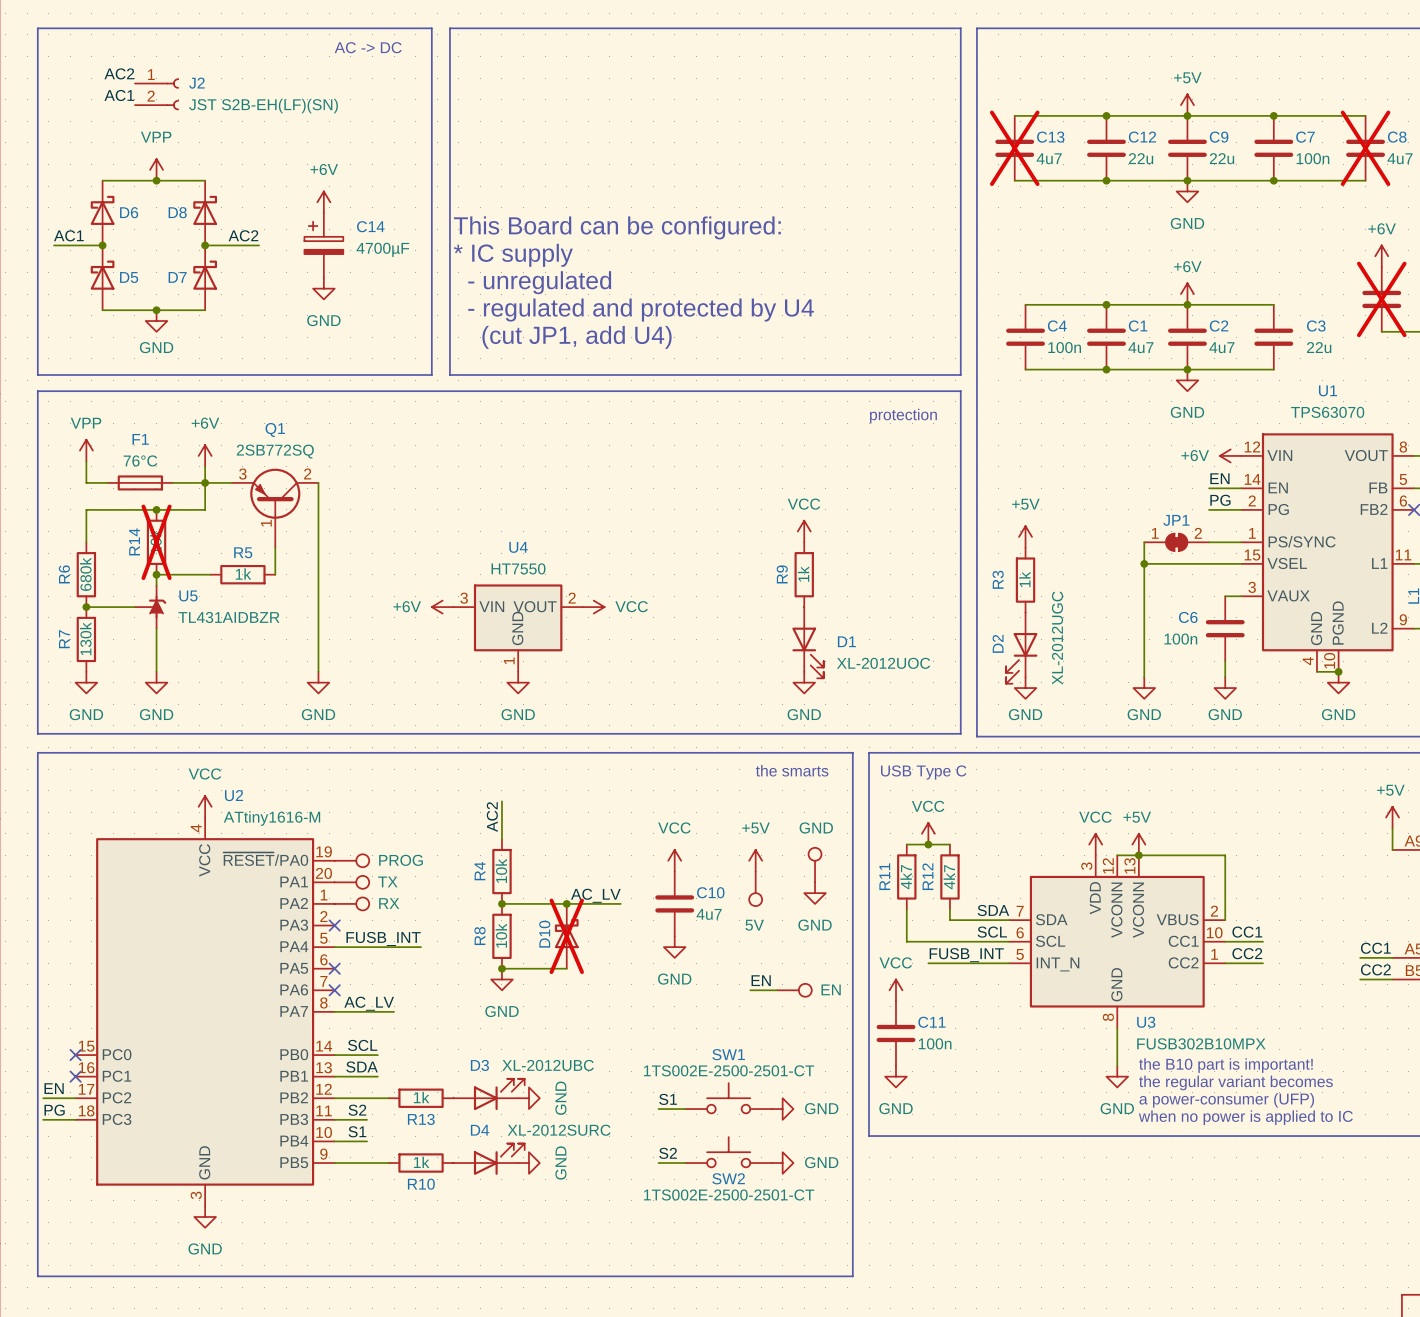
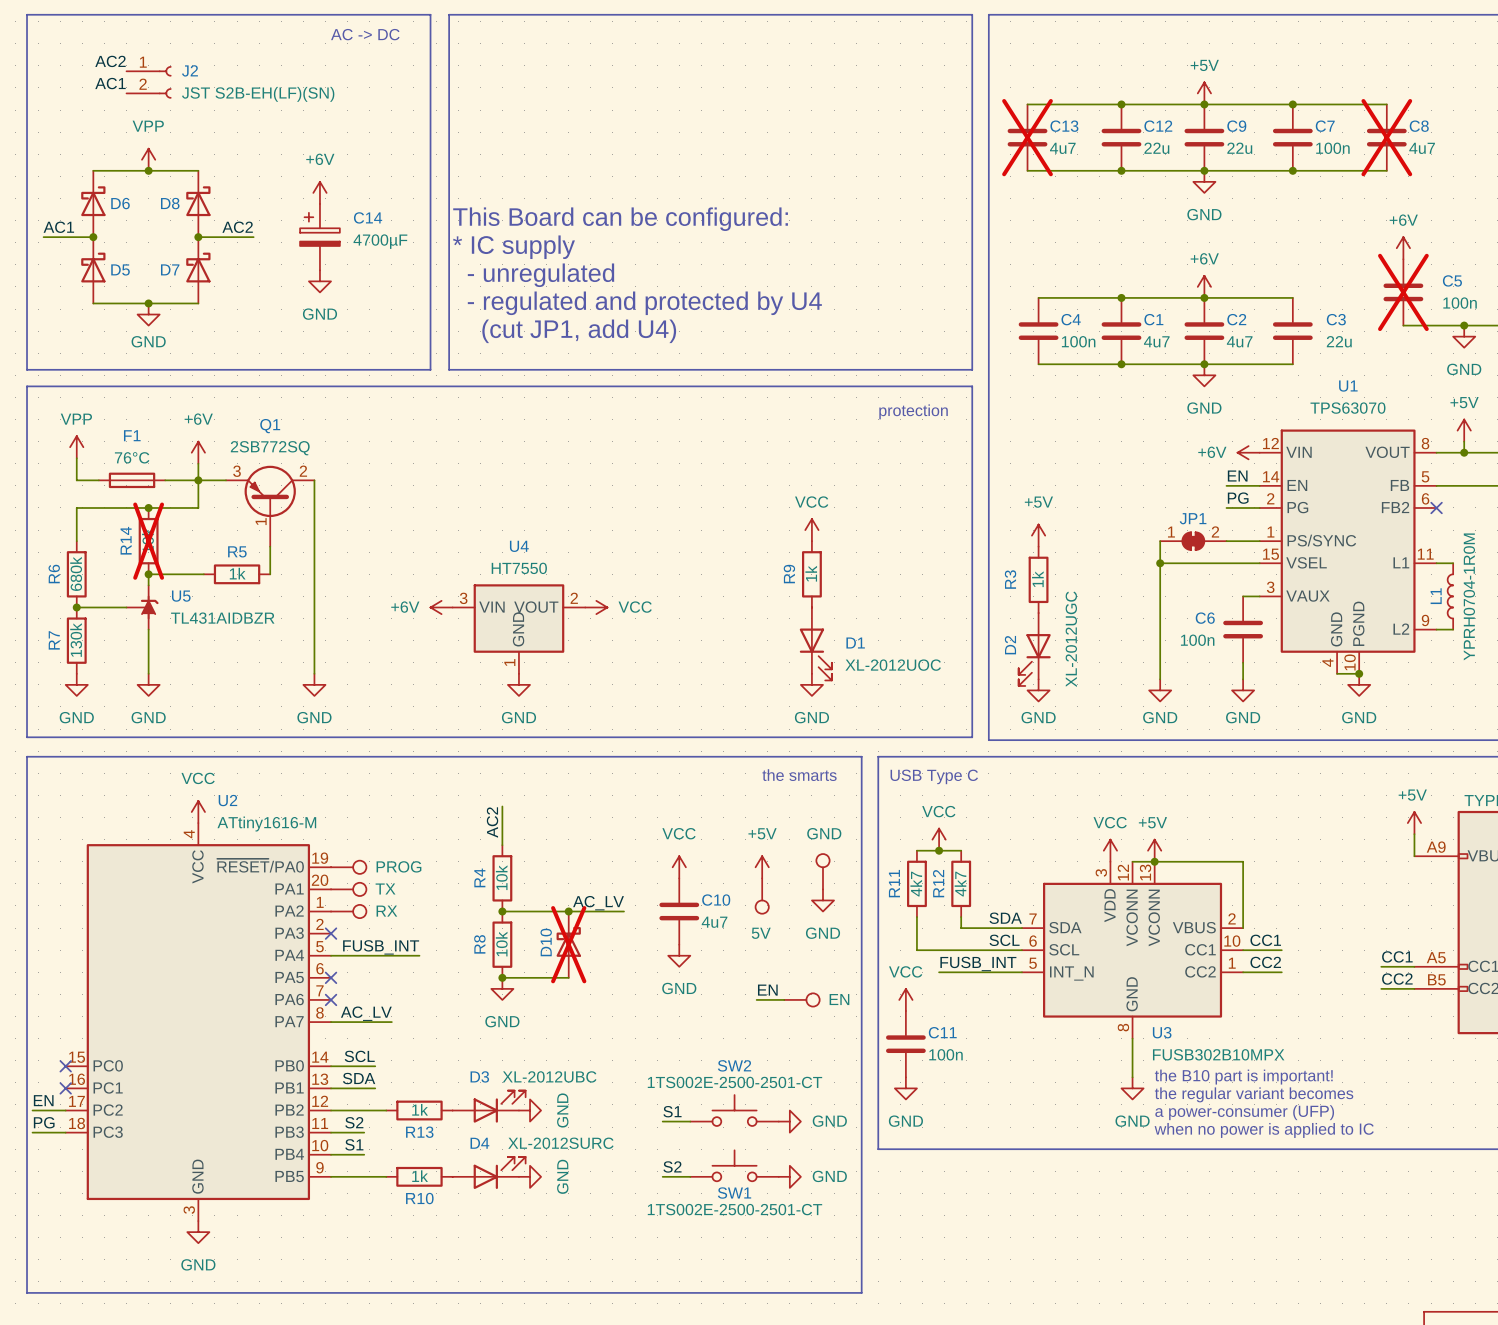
SW1 name: SW1 (728, 1054) -> SW2 (734, 1065)
SW2 name: SW2 (728, 1178) -> SW1 (734, 1193)

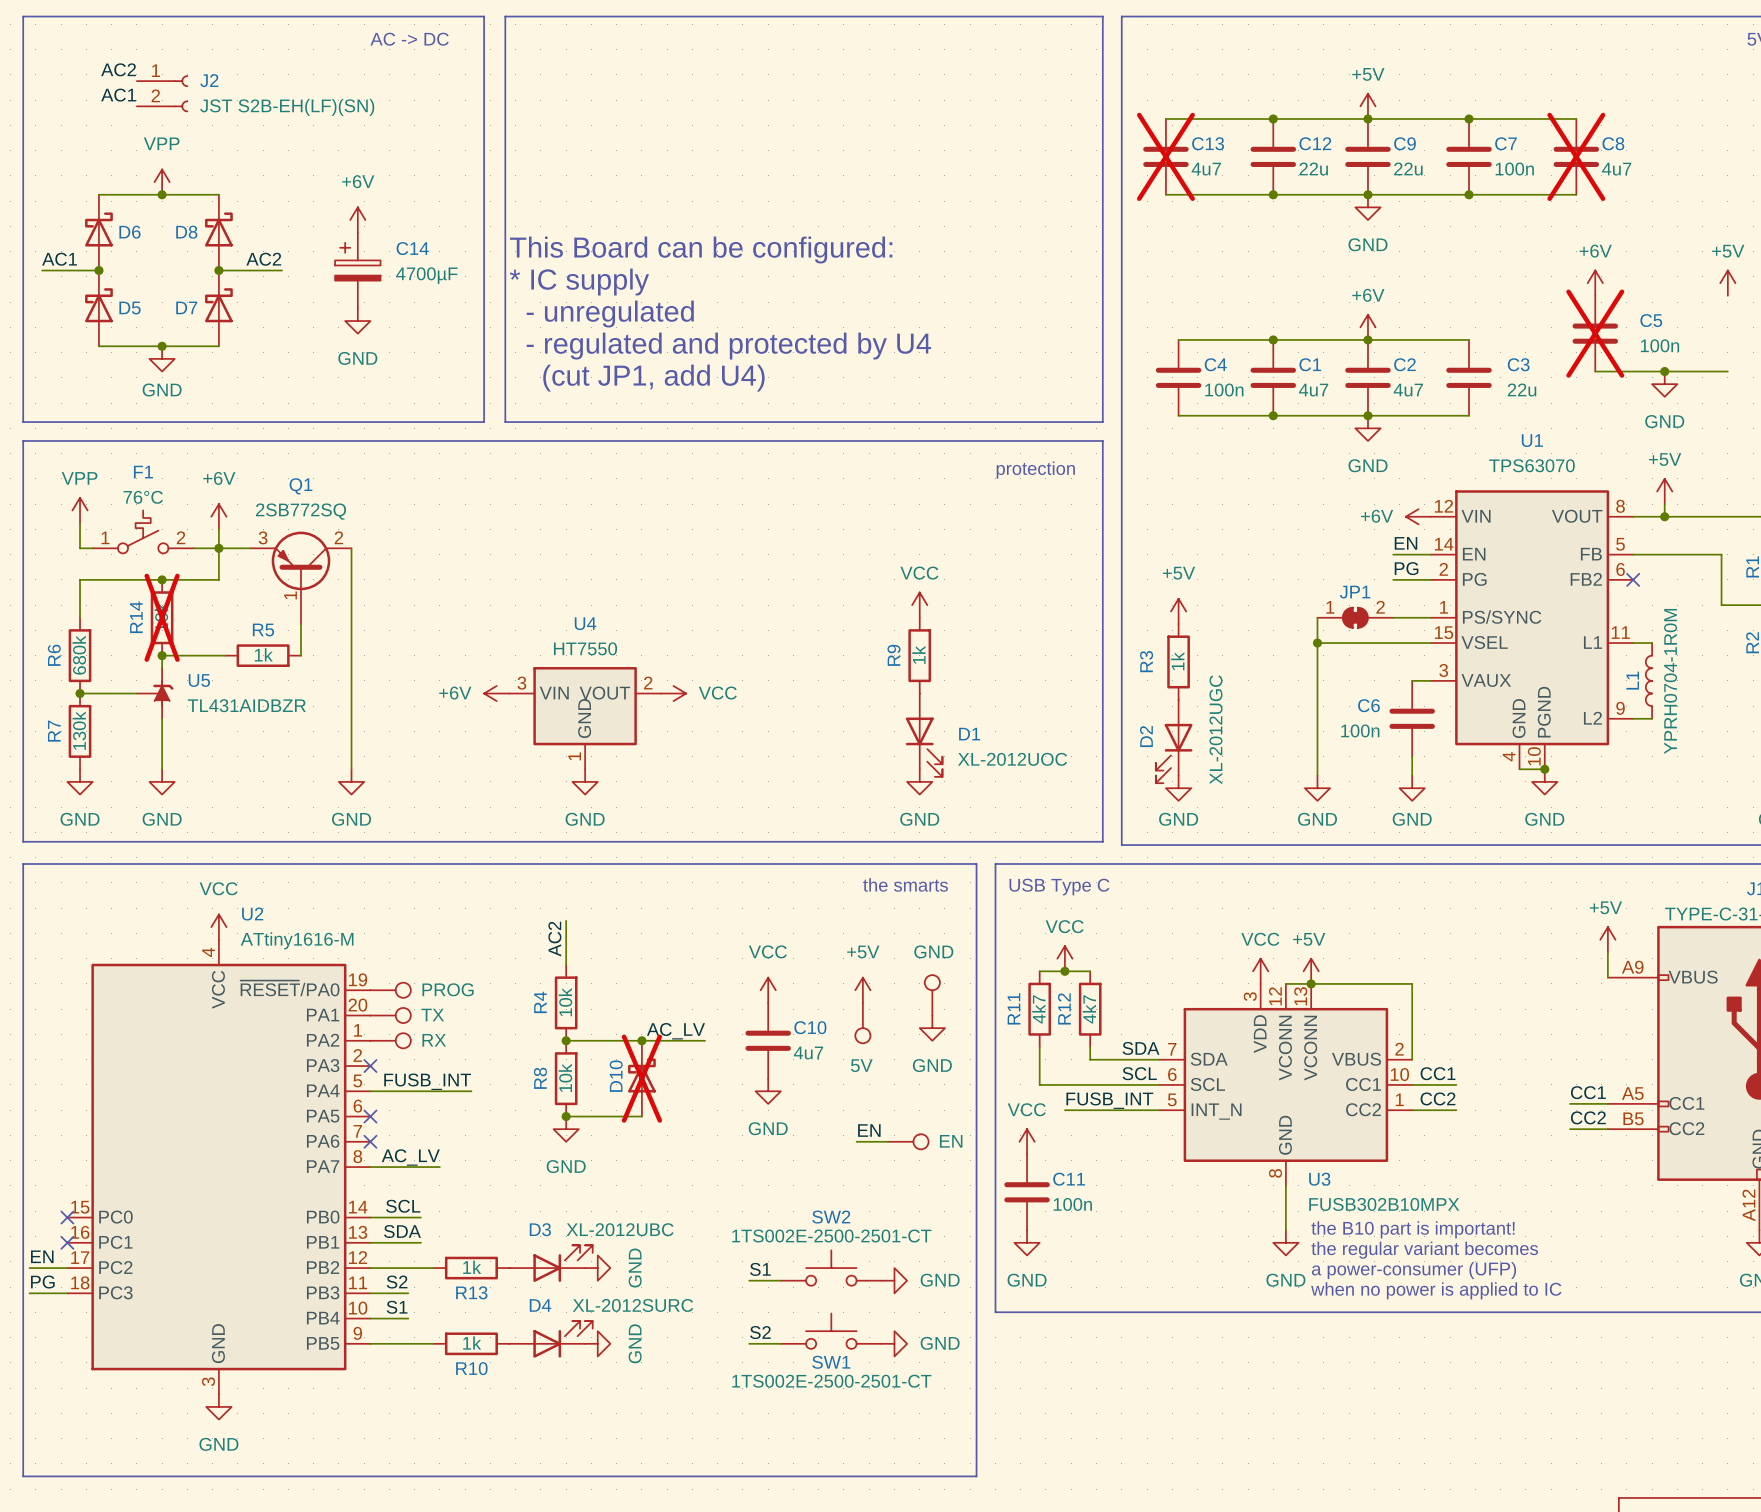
F1 symbol: [98, 472, 166, 489] -> [92, 510, 194, 554]

